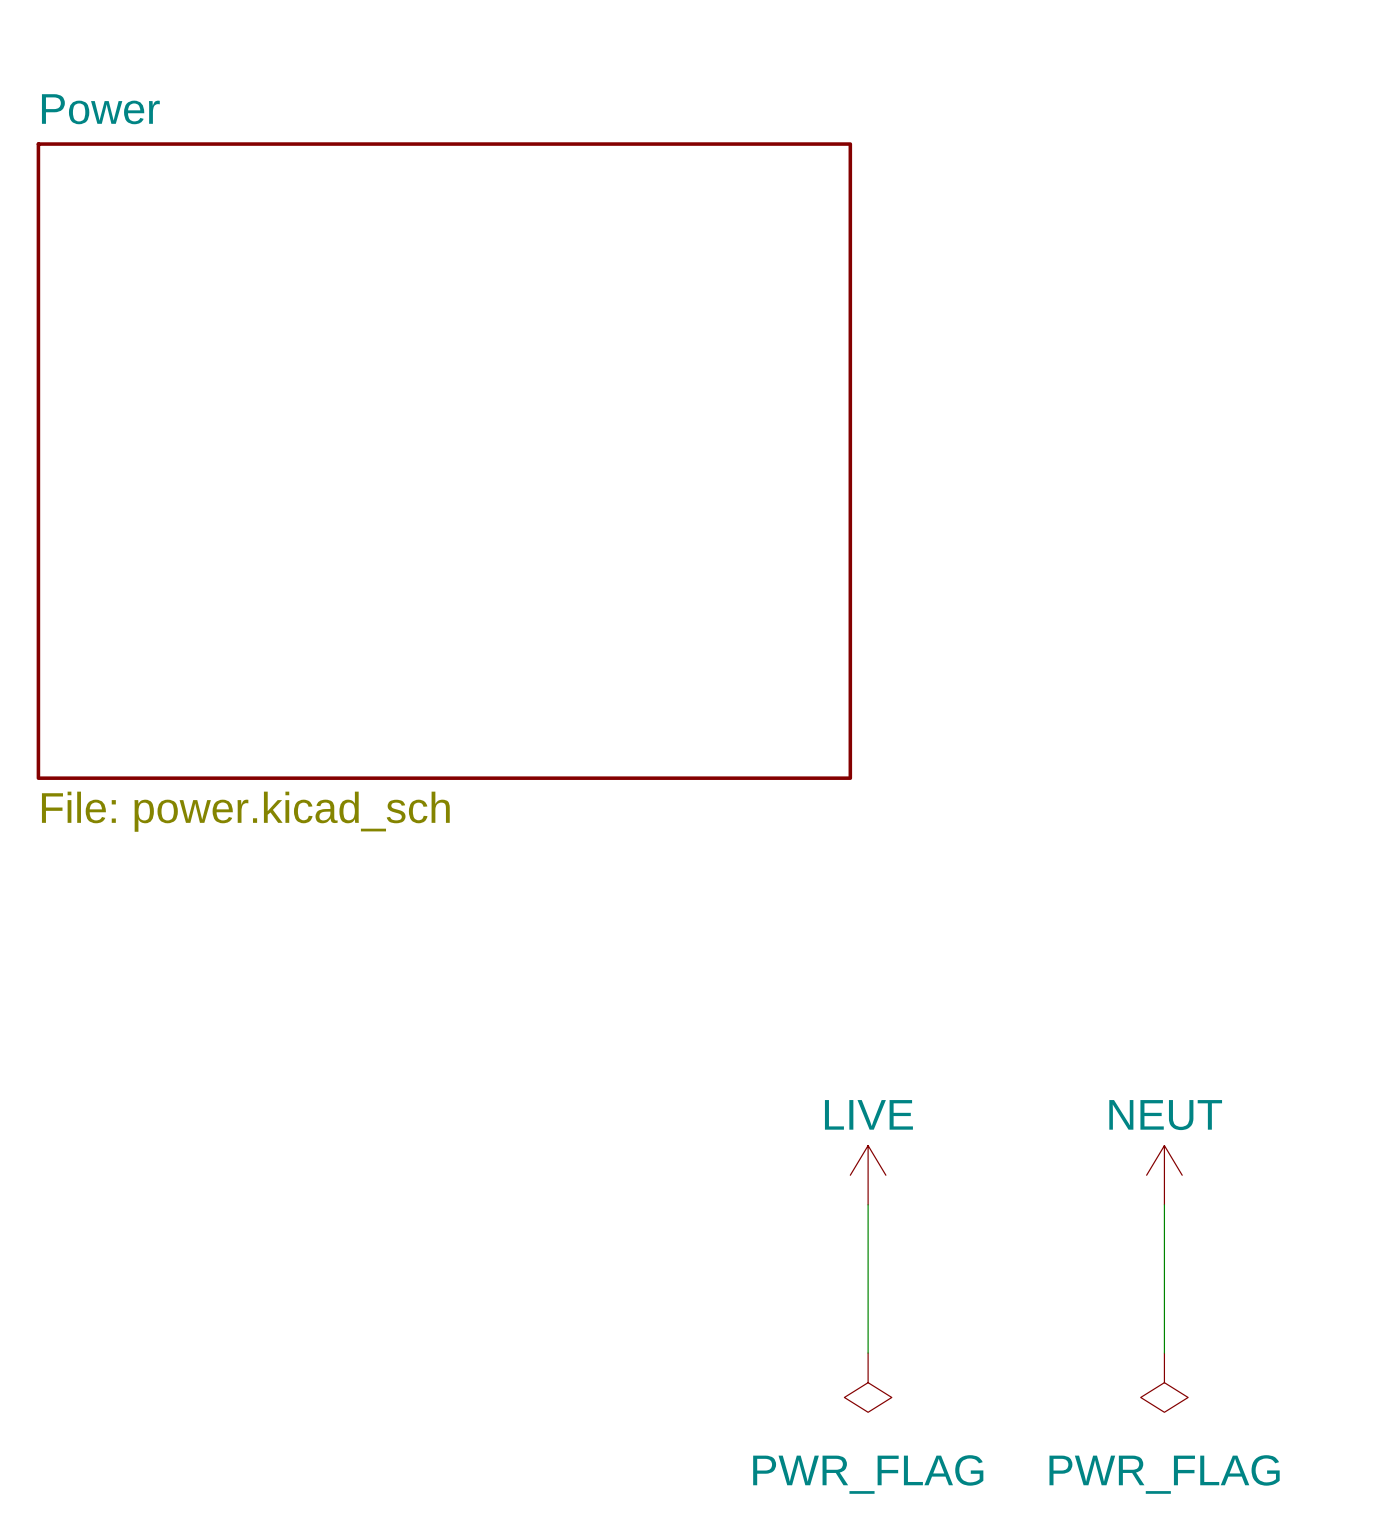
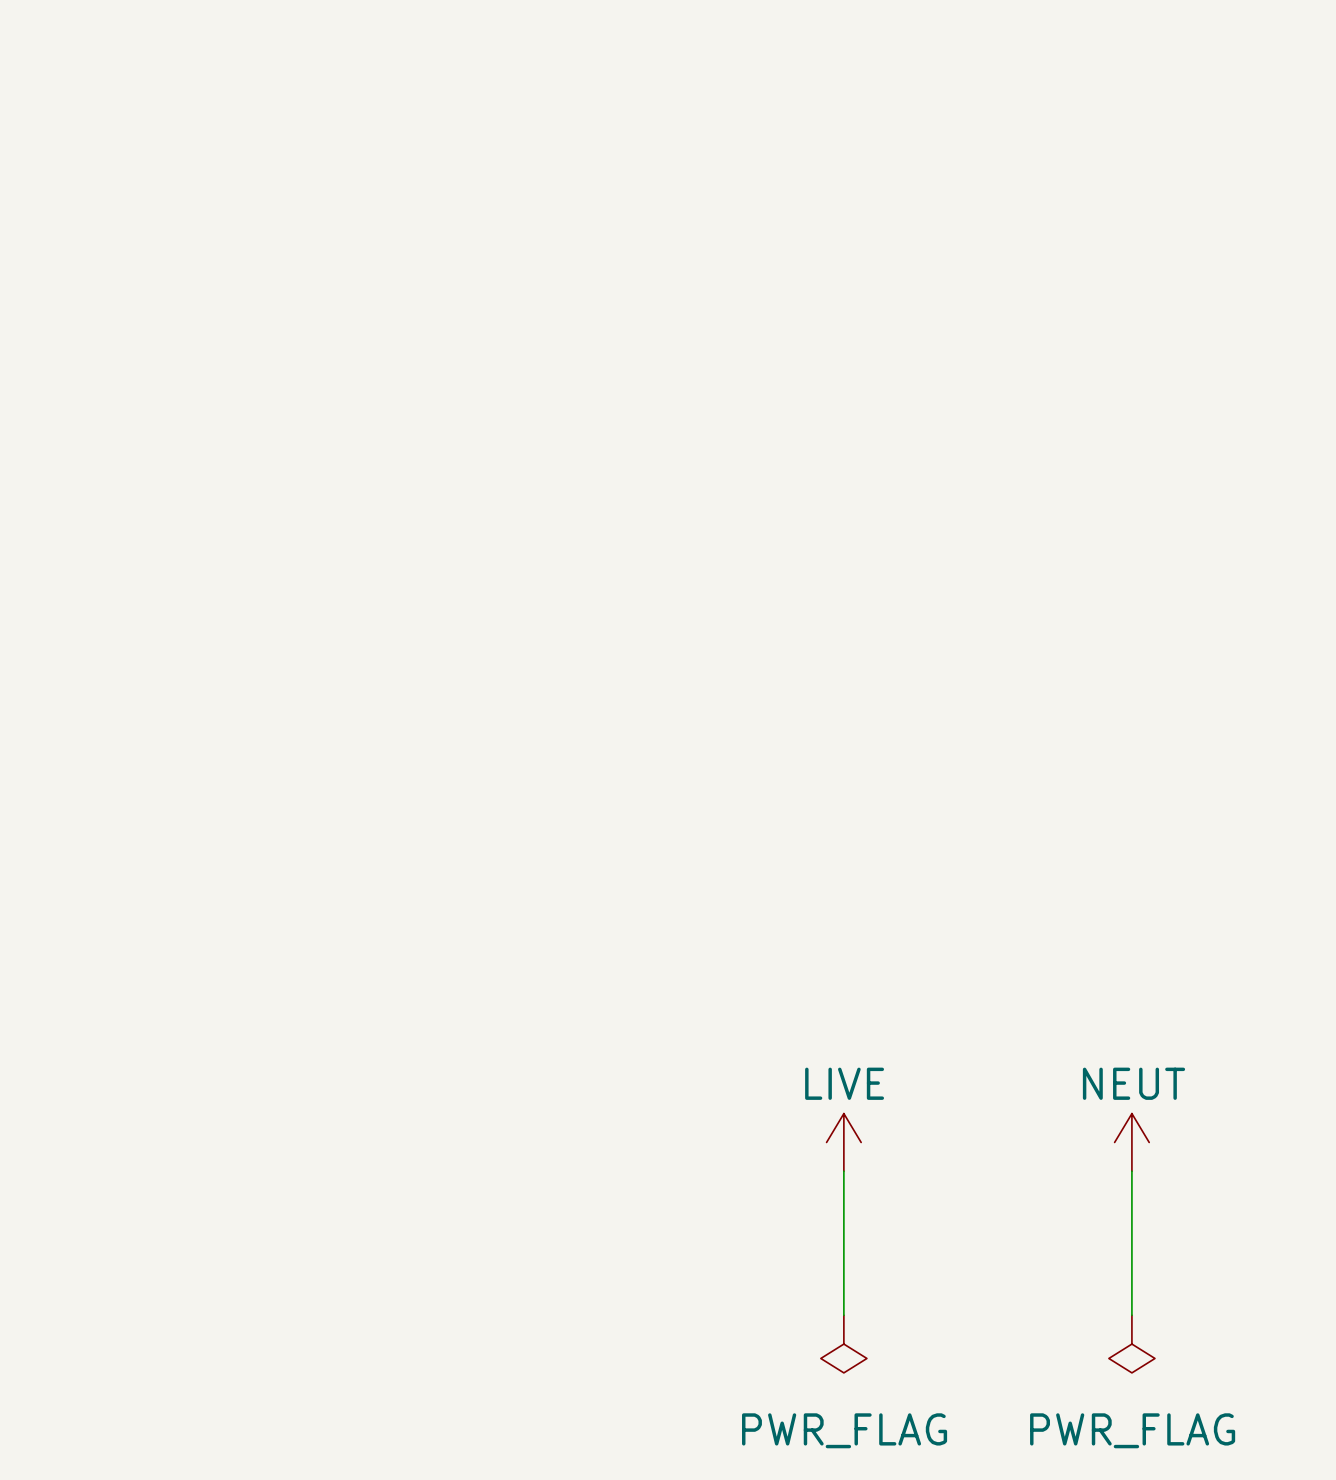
sheet Power: File: power.kicad_sch (444, 461) -> none

